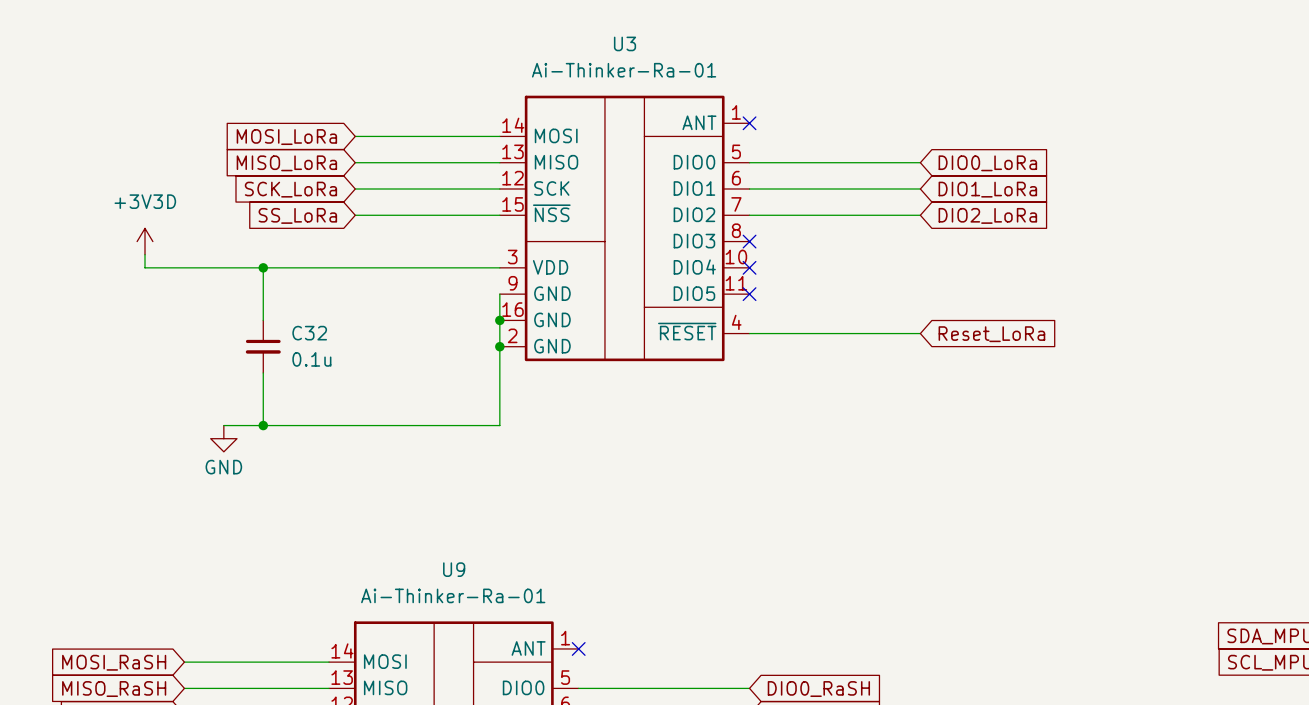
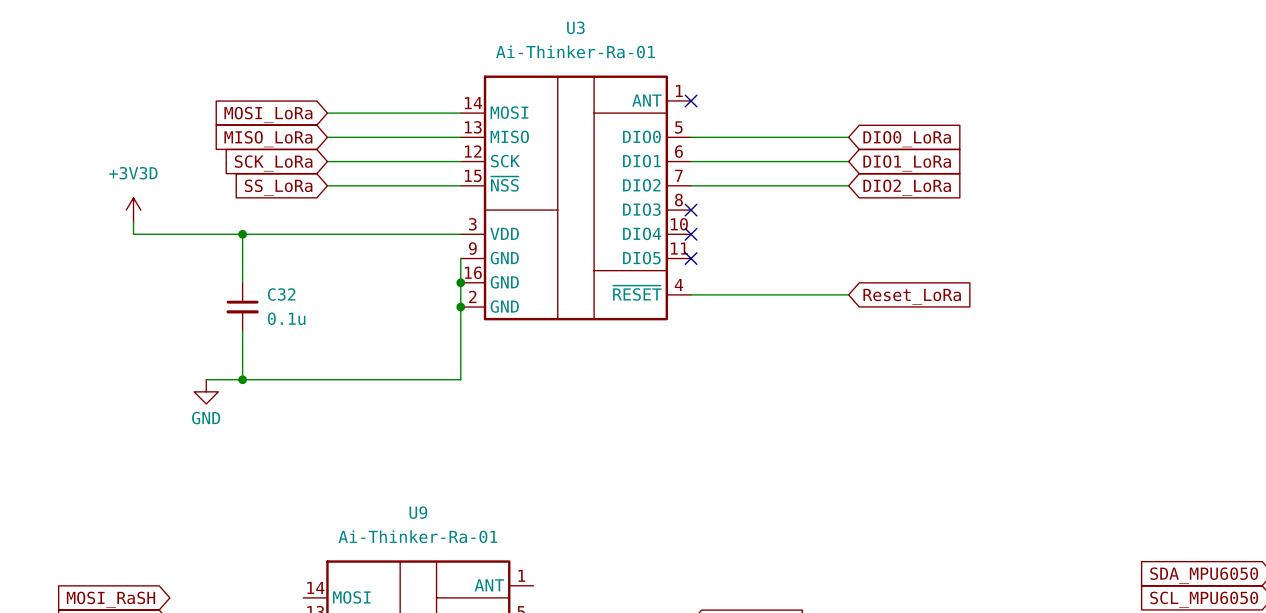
no-connect mark: (578, 648) -> none
wire: (184, 662) (328, 662) -> none

